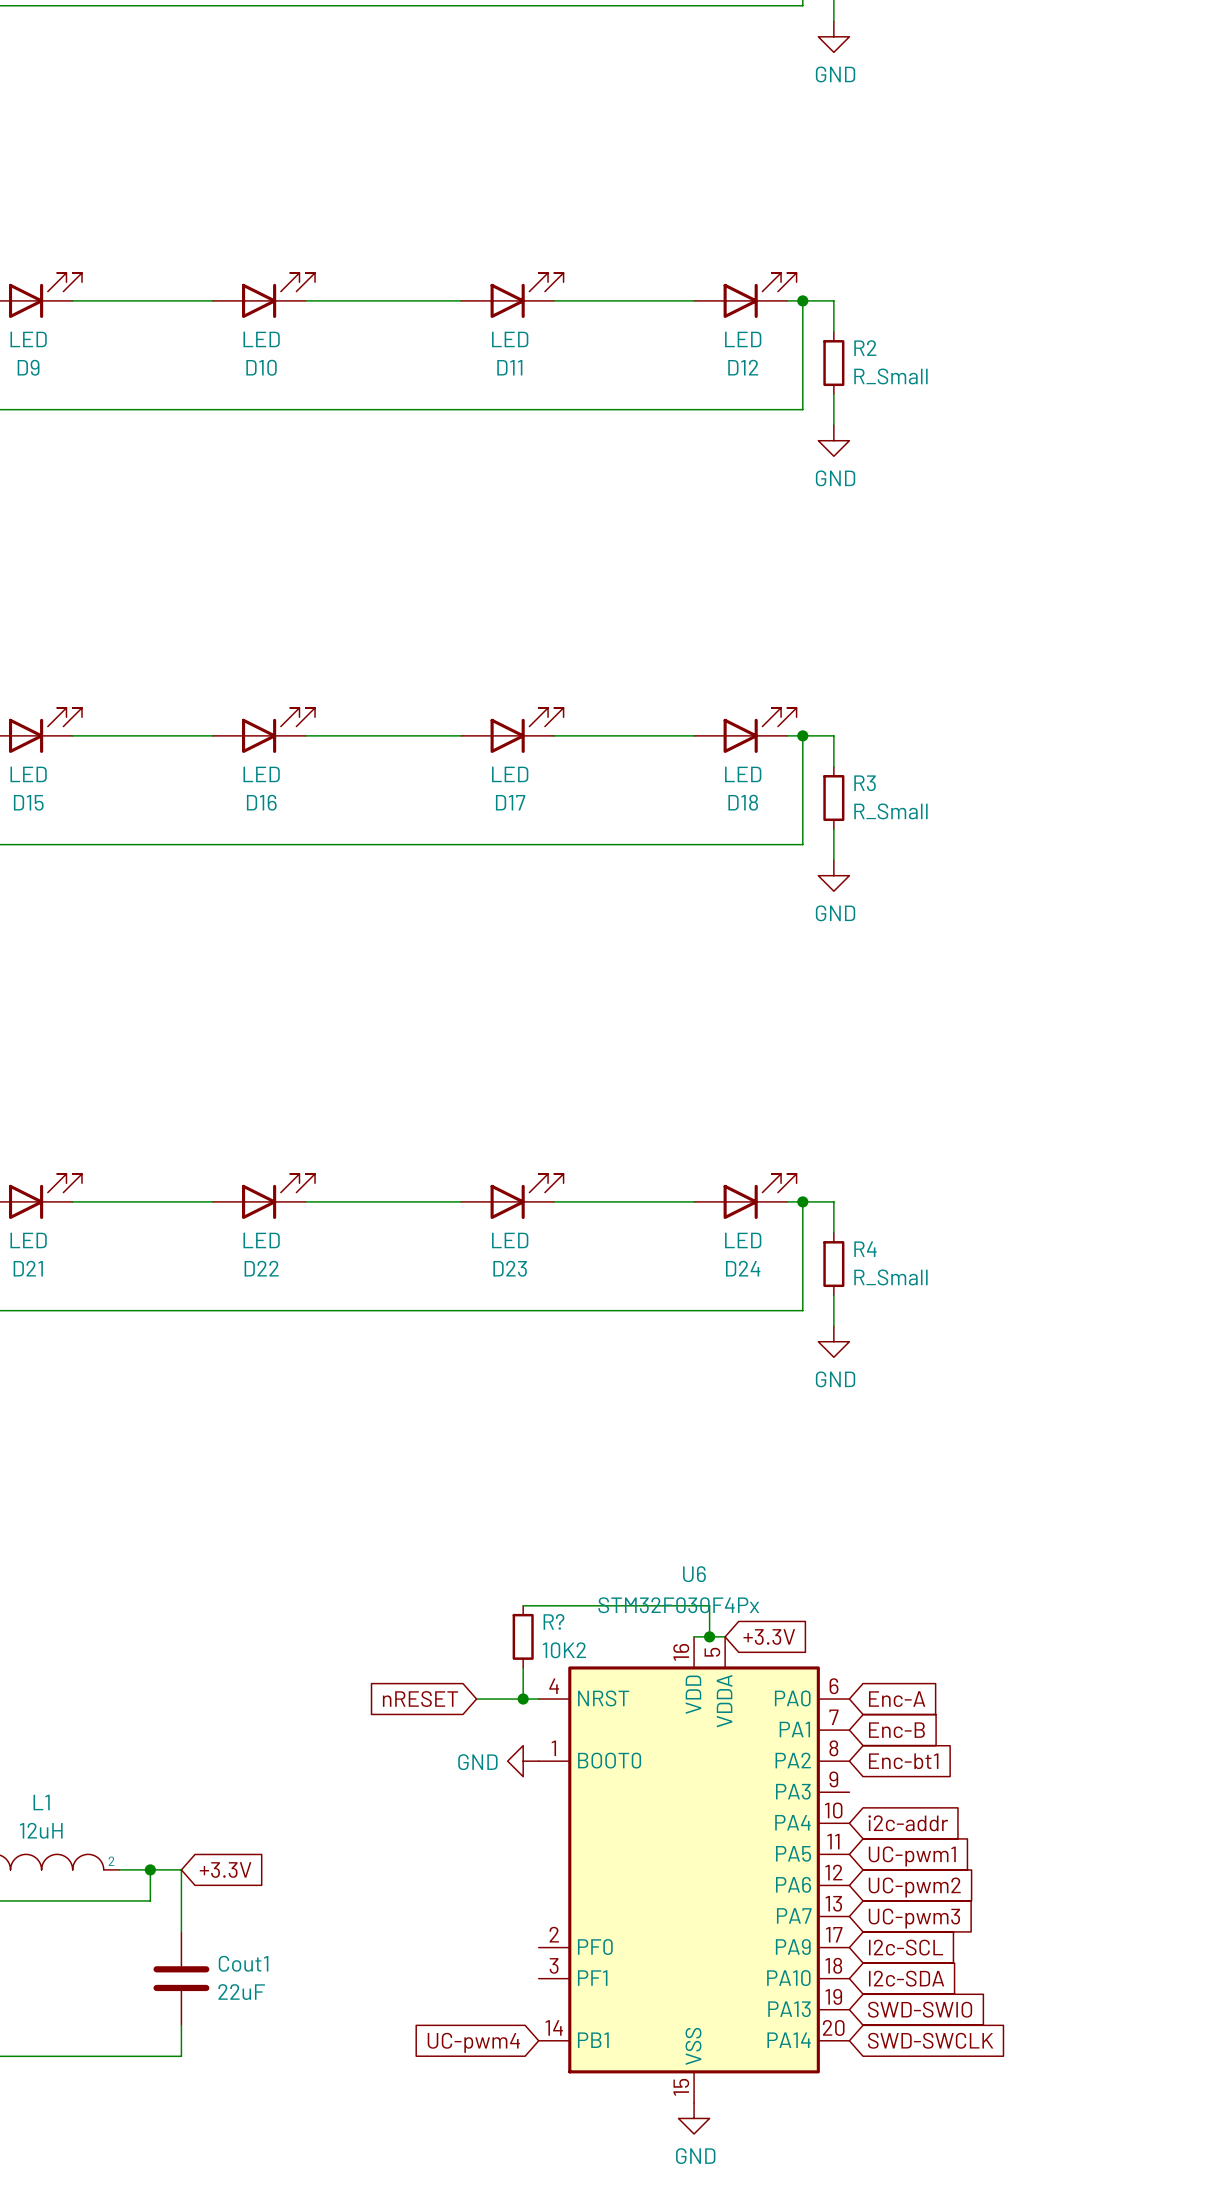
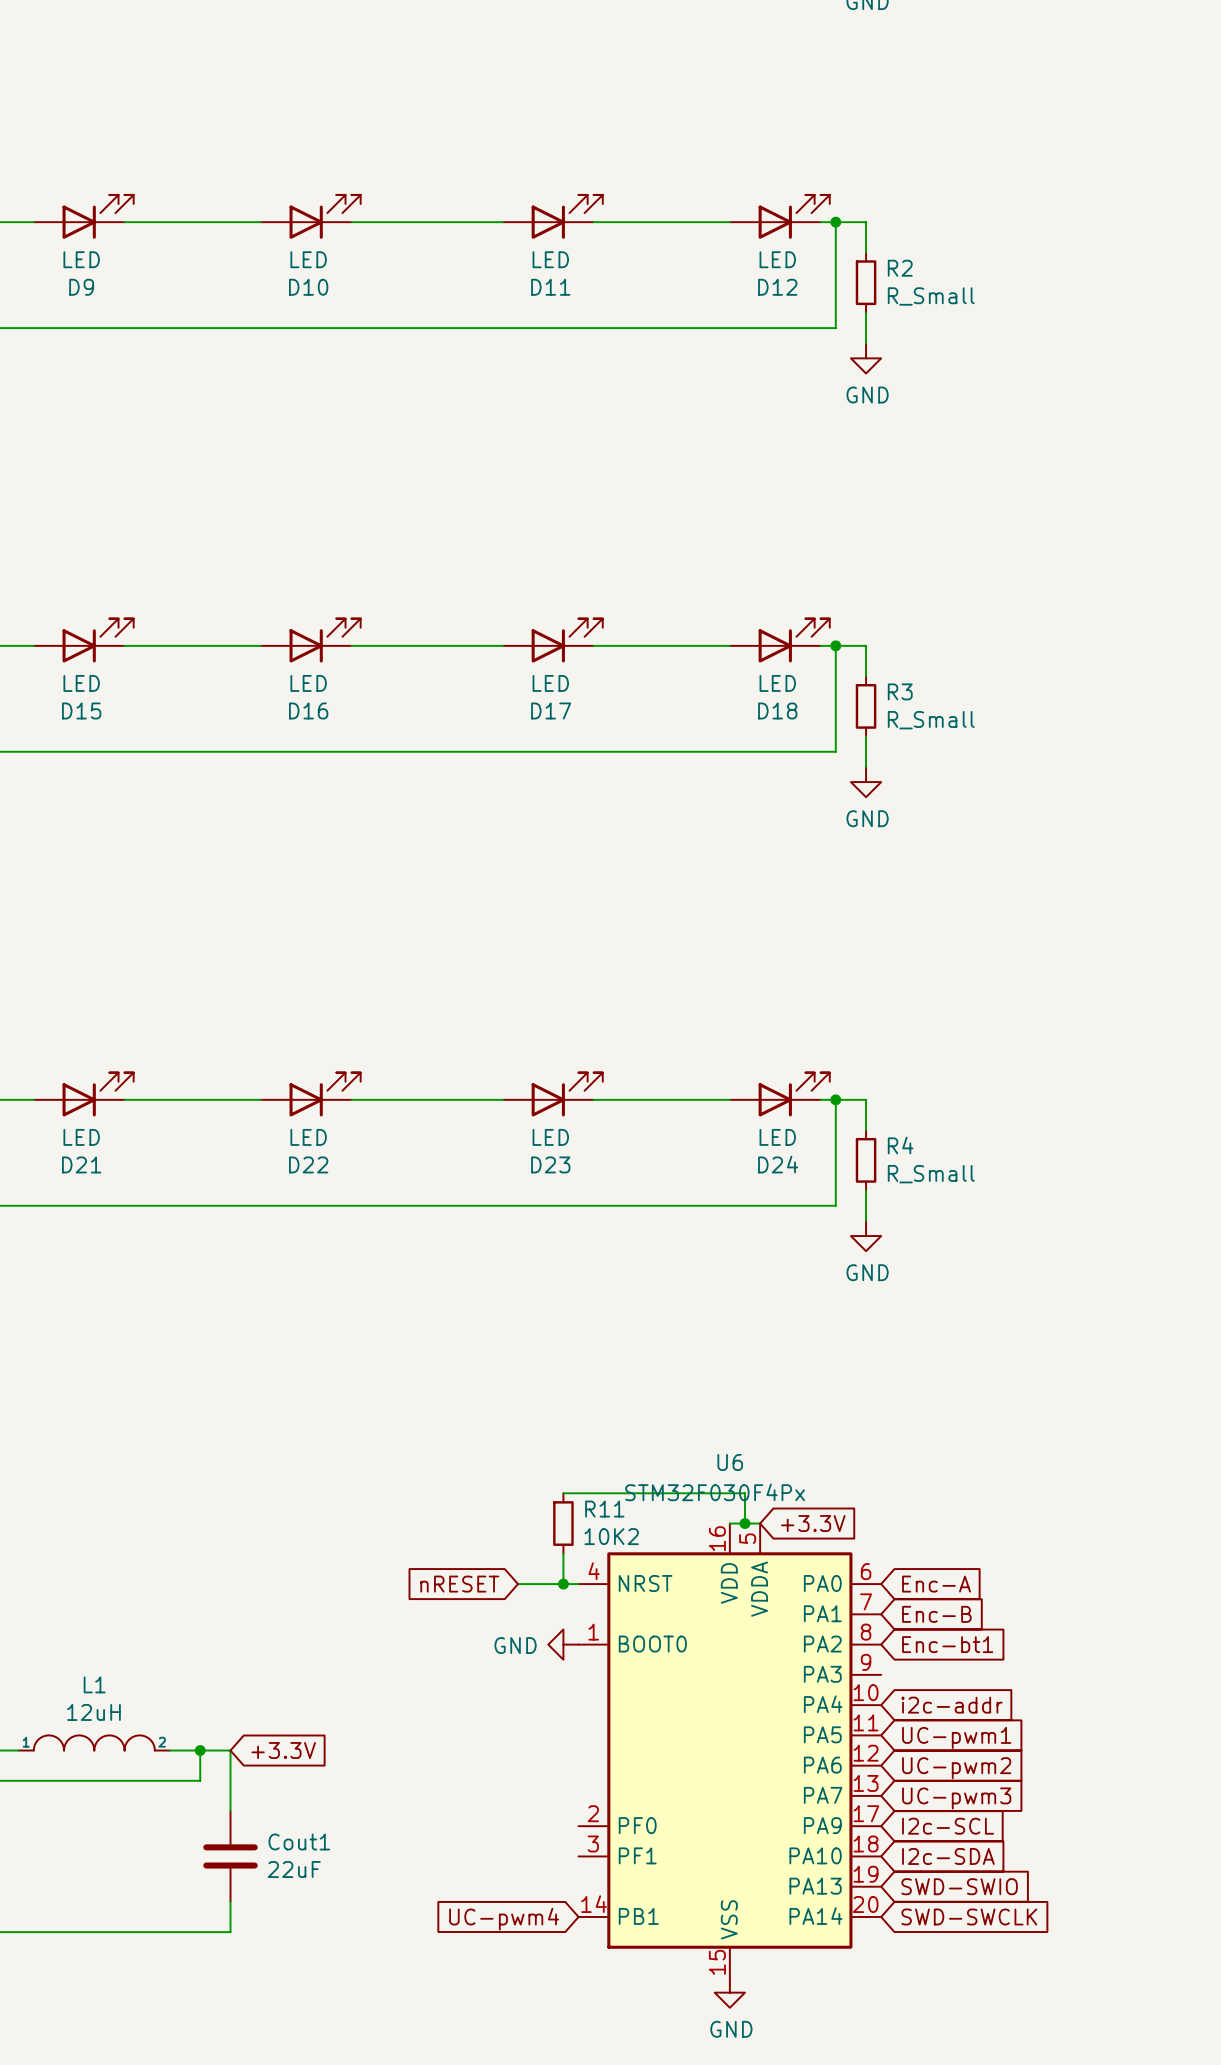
R? name: R? (553, 1621) -> R11 (604, 1509)

